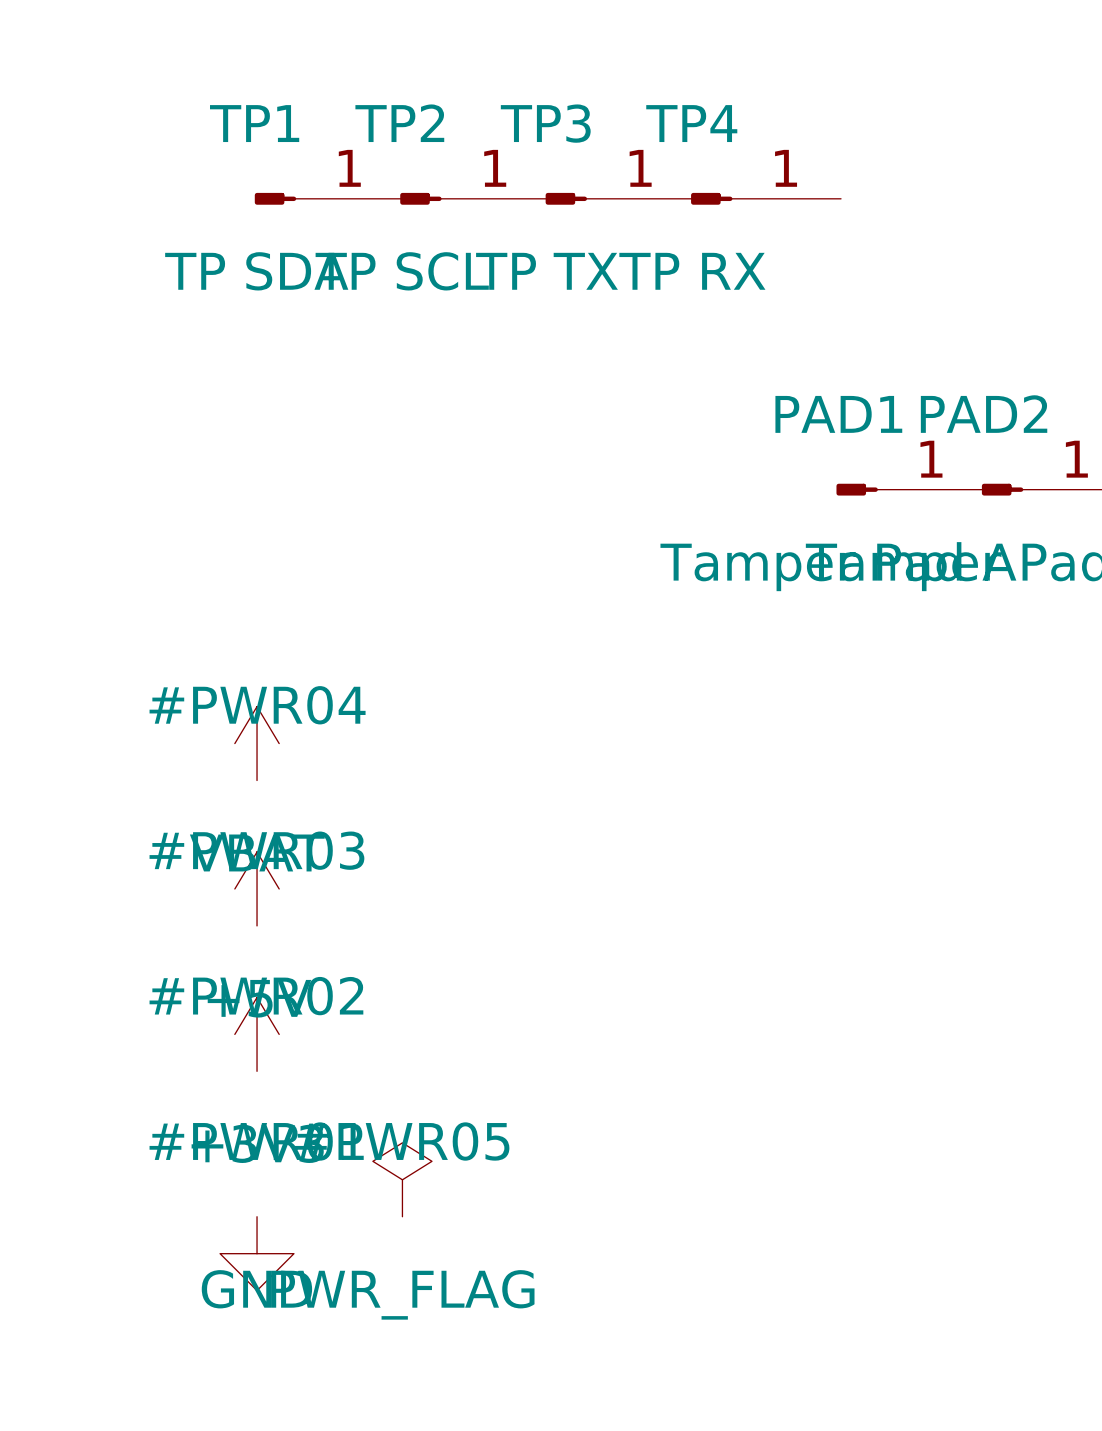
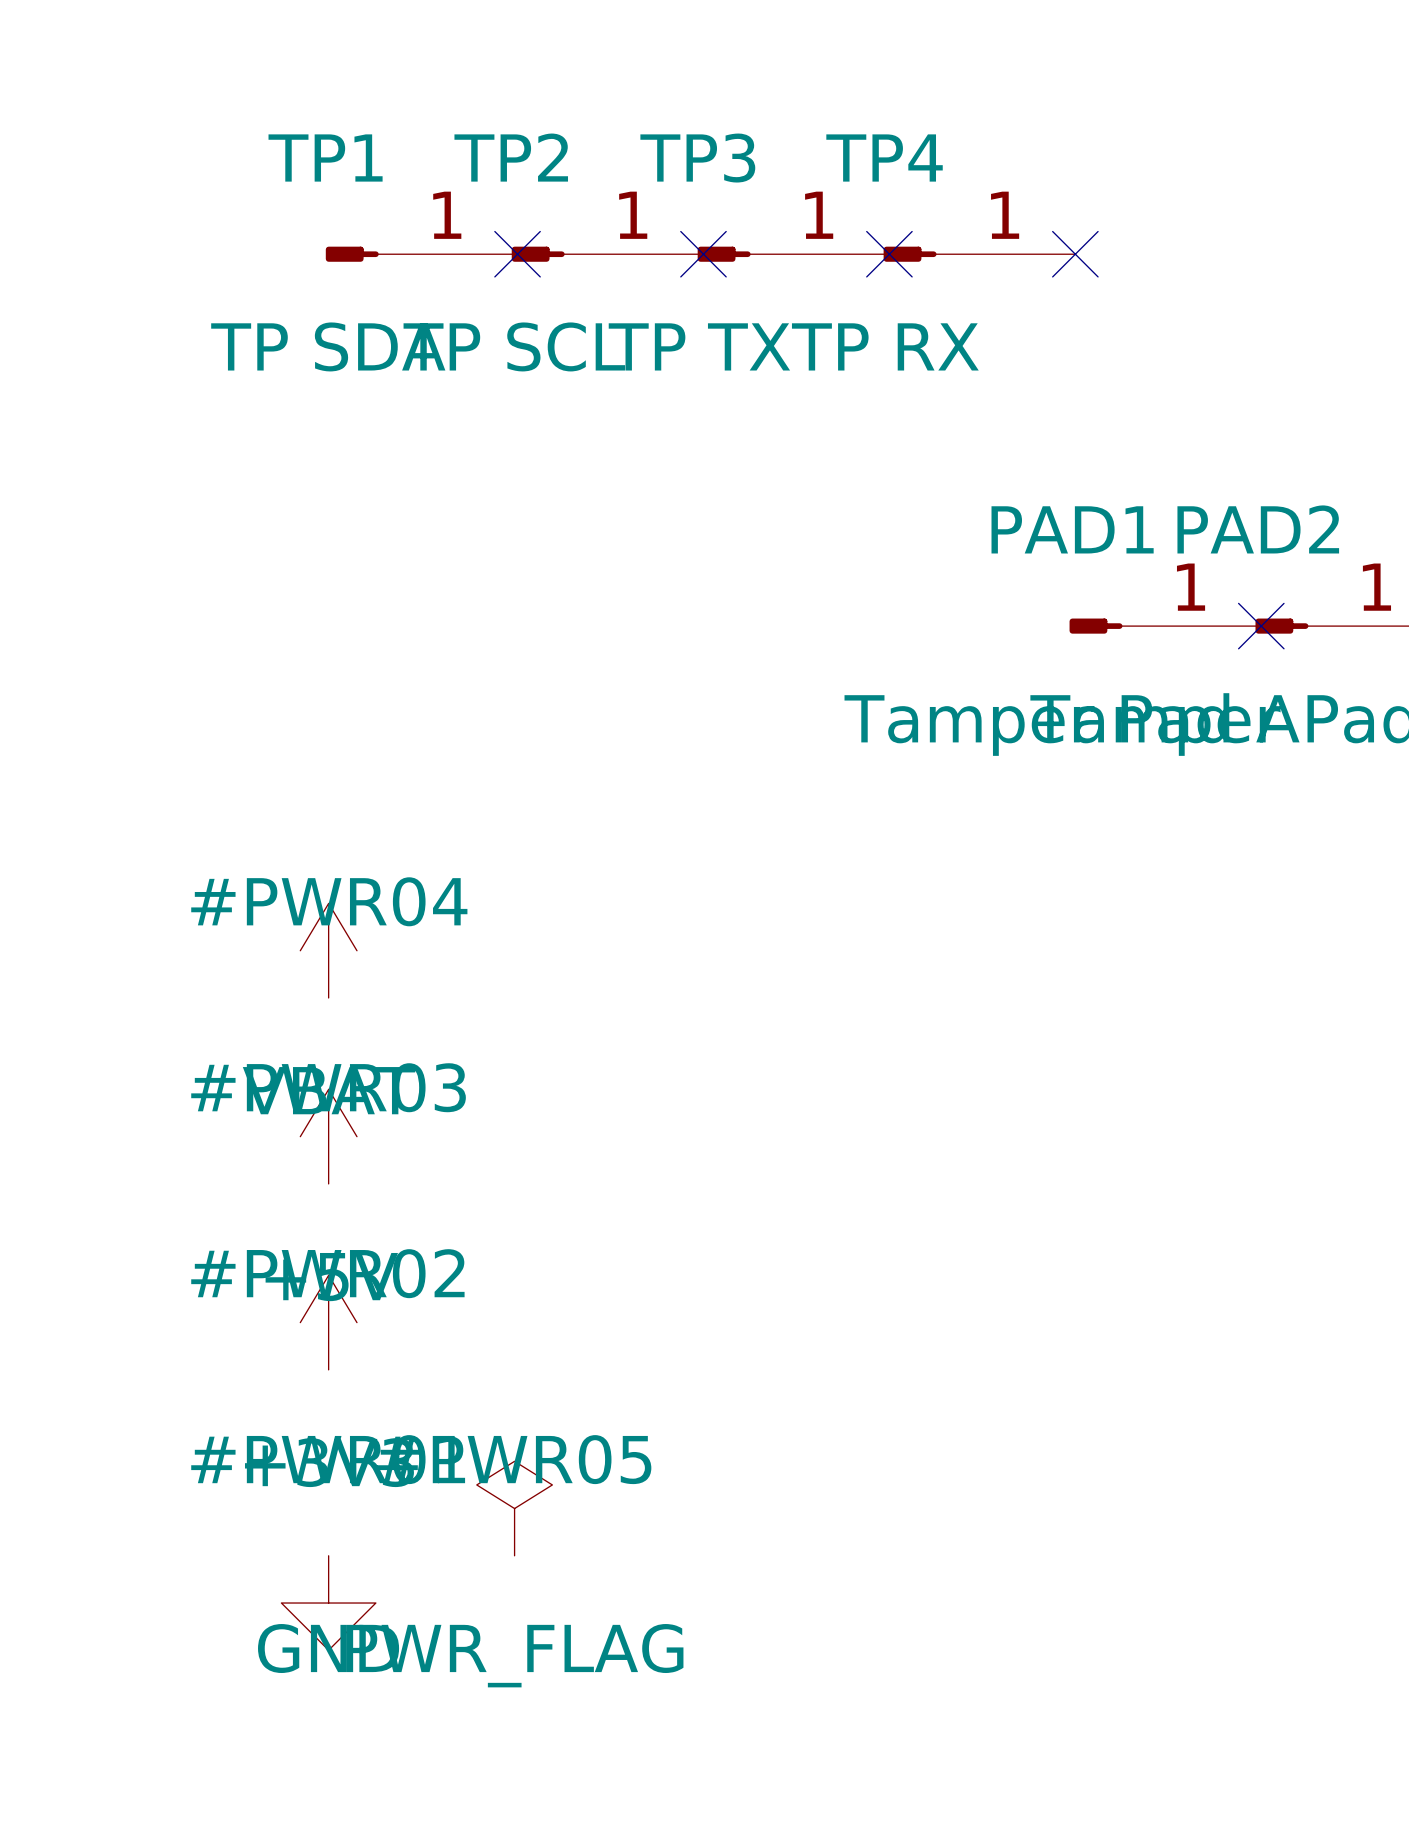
no-connect mark: none -> (517, 254)
no-connect mark: none -> (703, 254)
no-connect mark: none -> (889, 254)
no-connect mark: none -> (1075, 254)
no-connect mark: none -> (1261, 626)

